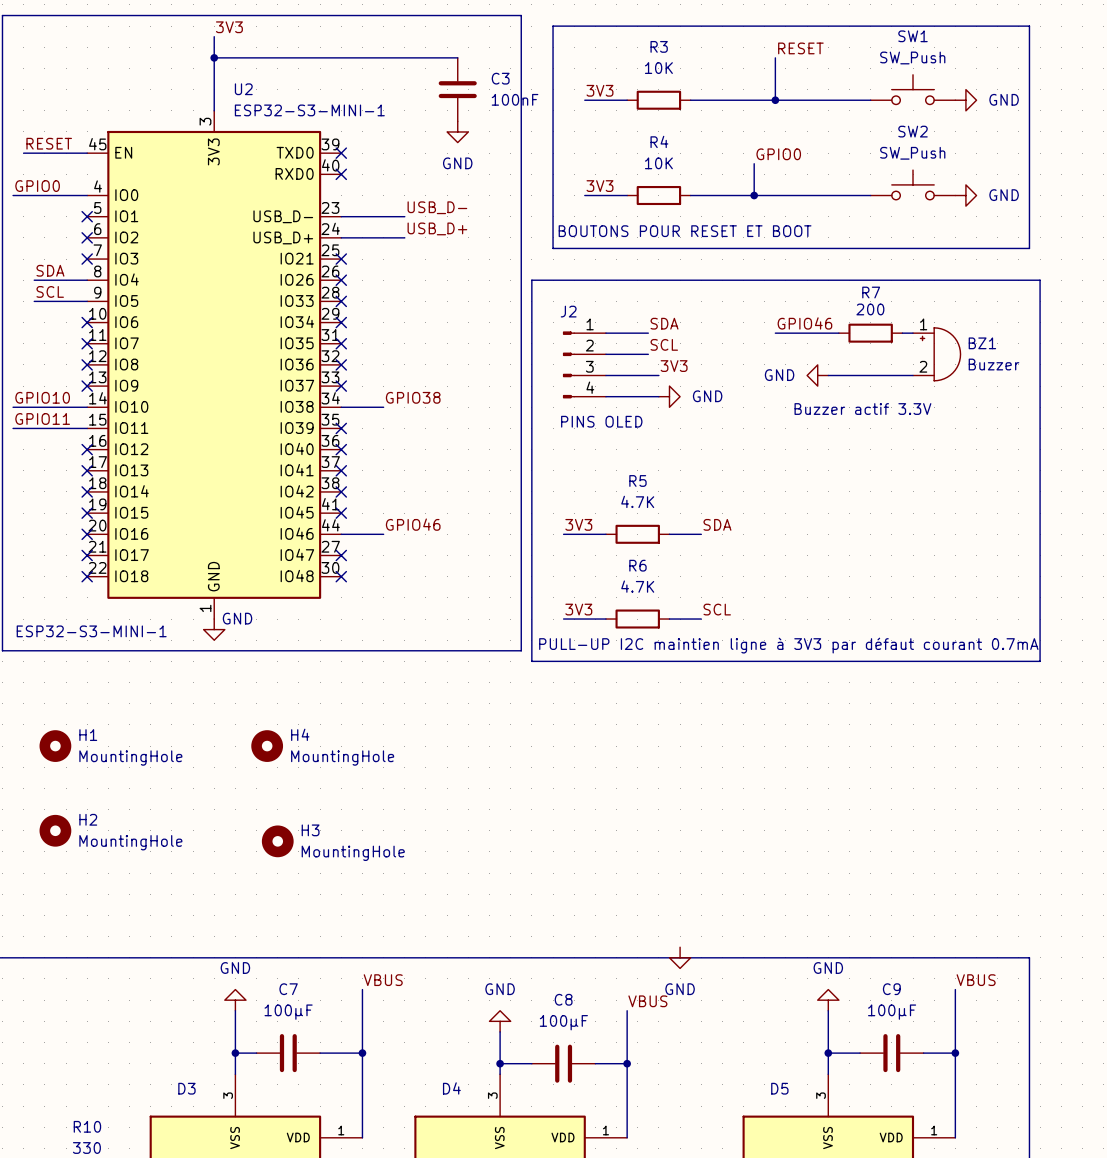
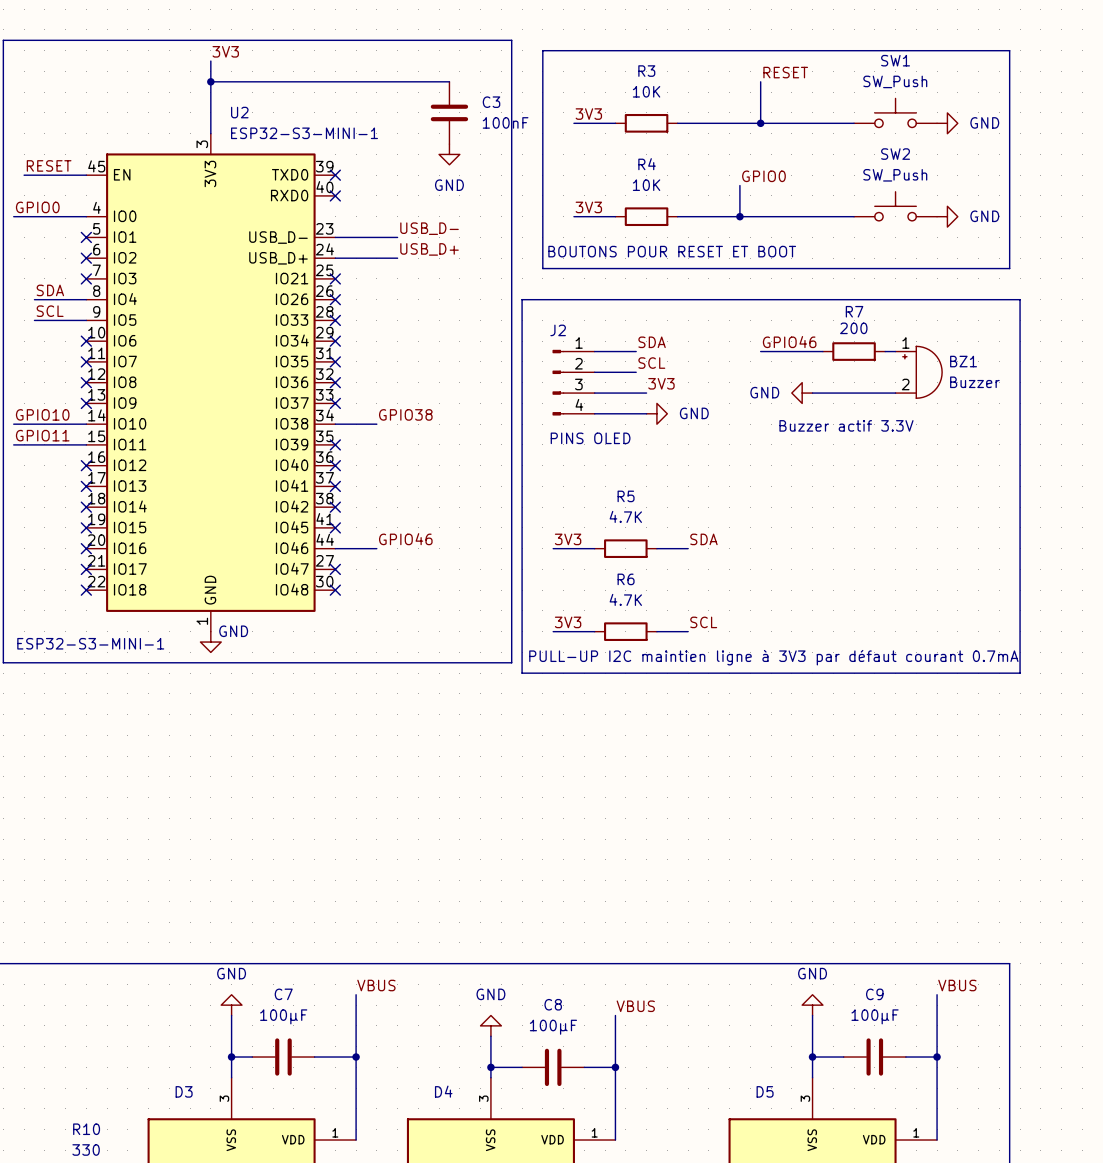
H1: MountingHole (55, 746) -> none
H4: MountingHole (267, 746) -> none
H2: MountingHole (55, 830) -> none
H3: MountingHole (277, 841) -> none
power symbol: GND (680, 957) -> none

